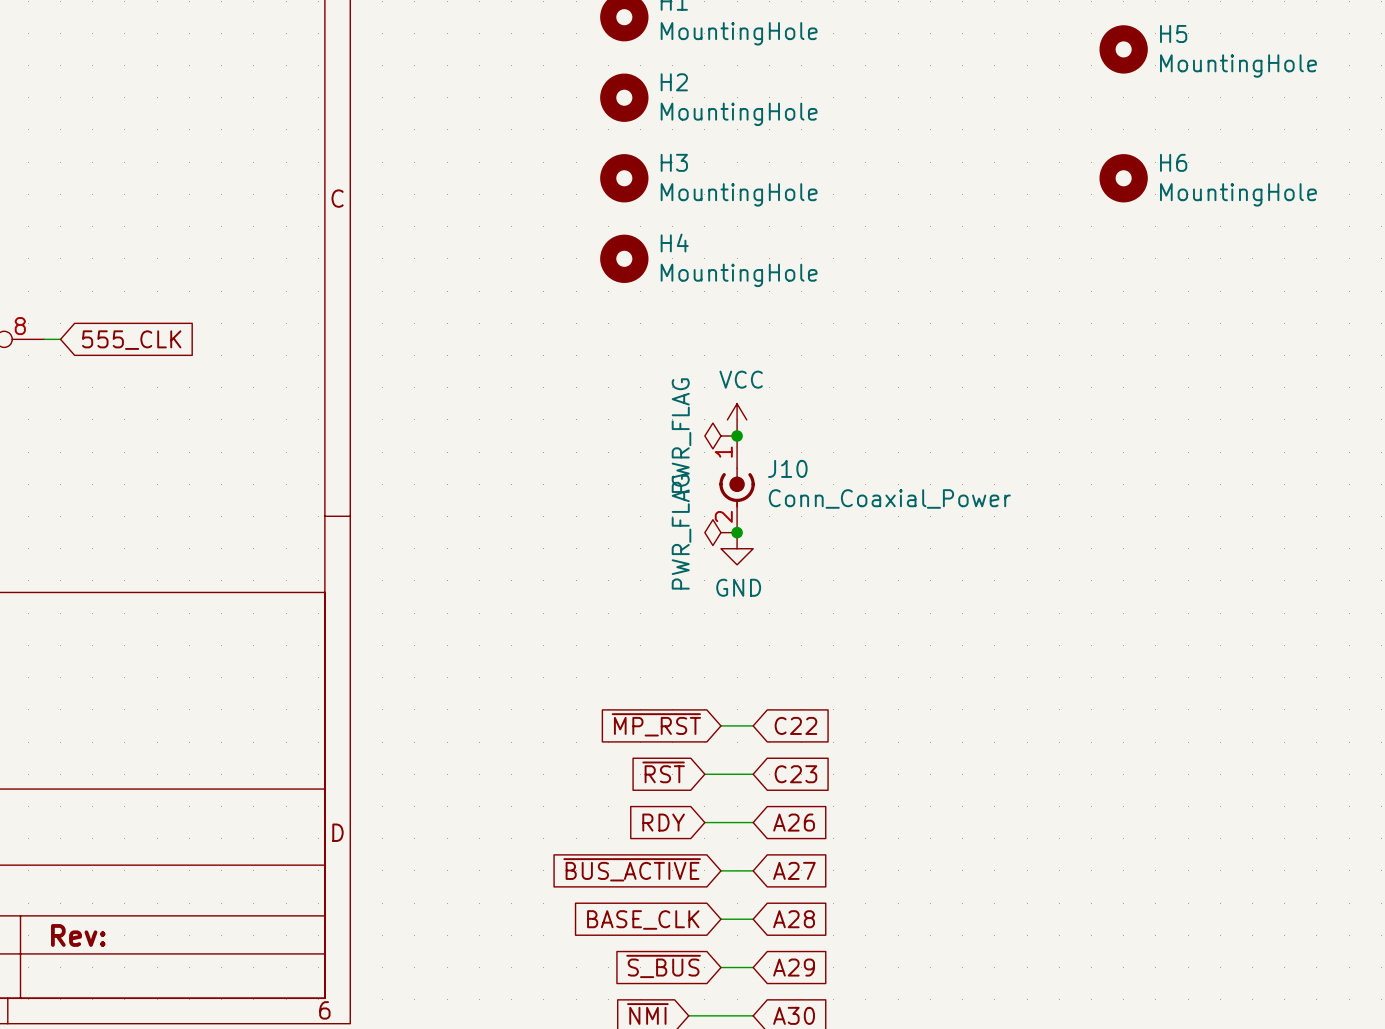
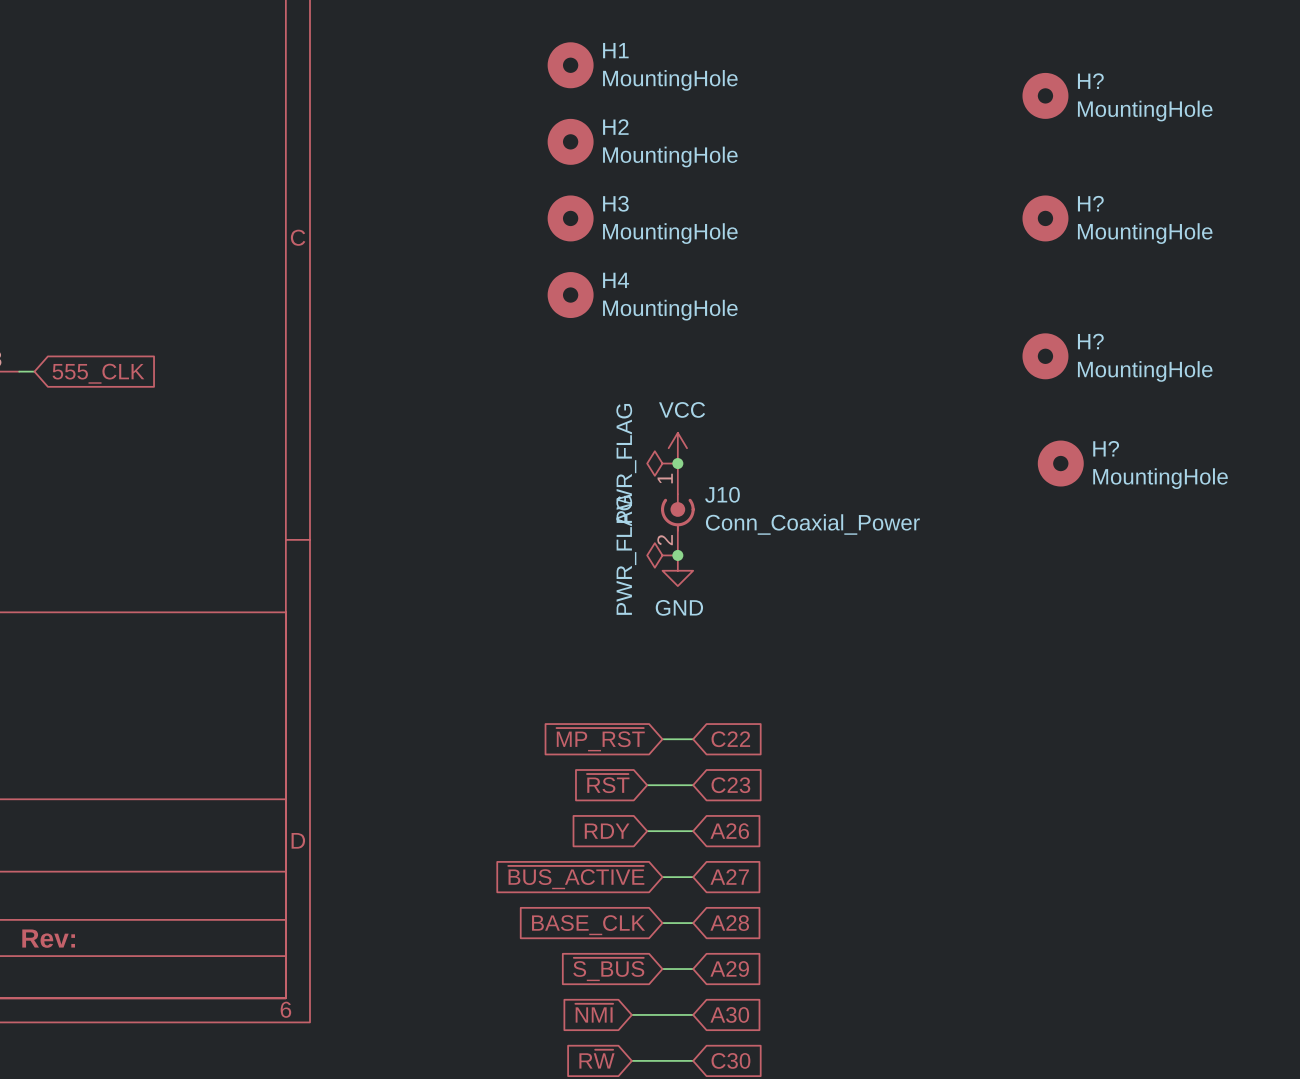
H5 name: H5 (1173, 33) -> H? (1090, 81)
H6 name: H6 (1173, 162) -> H? (1090, 203)
H?: none -> MountingHole (1045, 356)
H?: none -> MountingHole (1060, 463)

